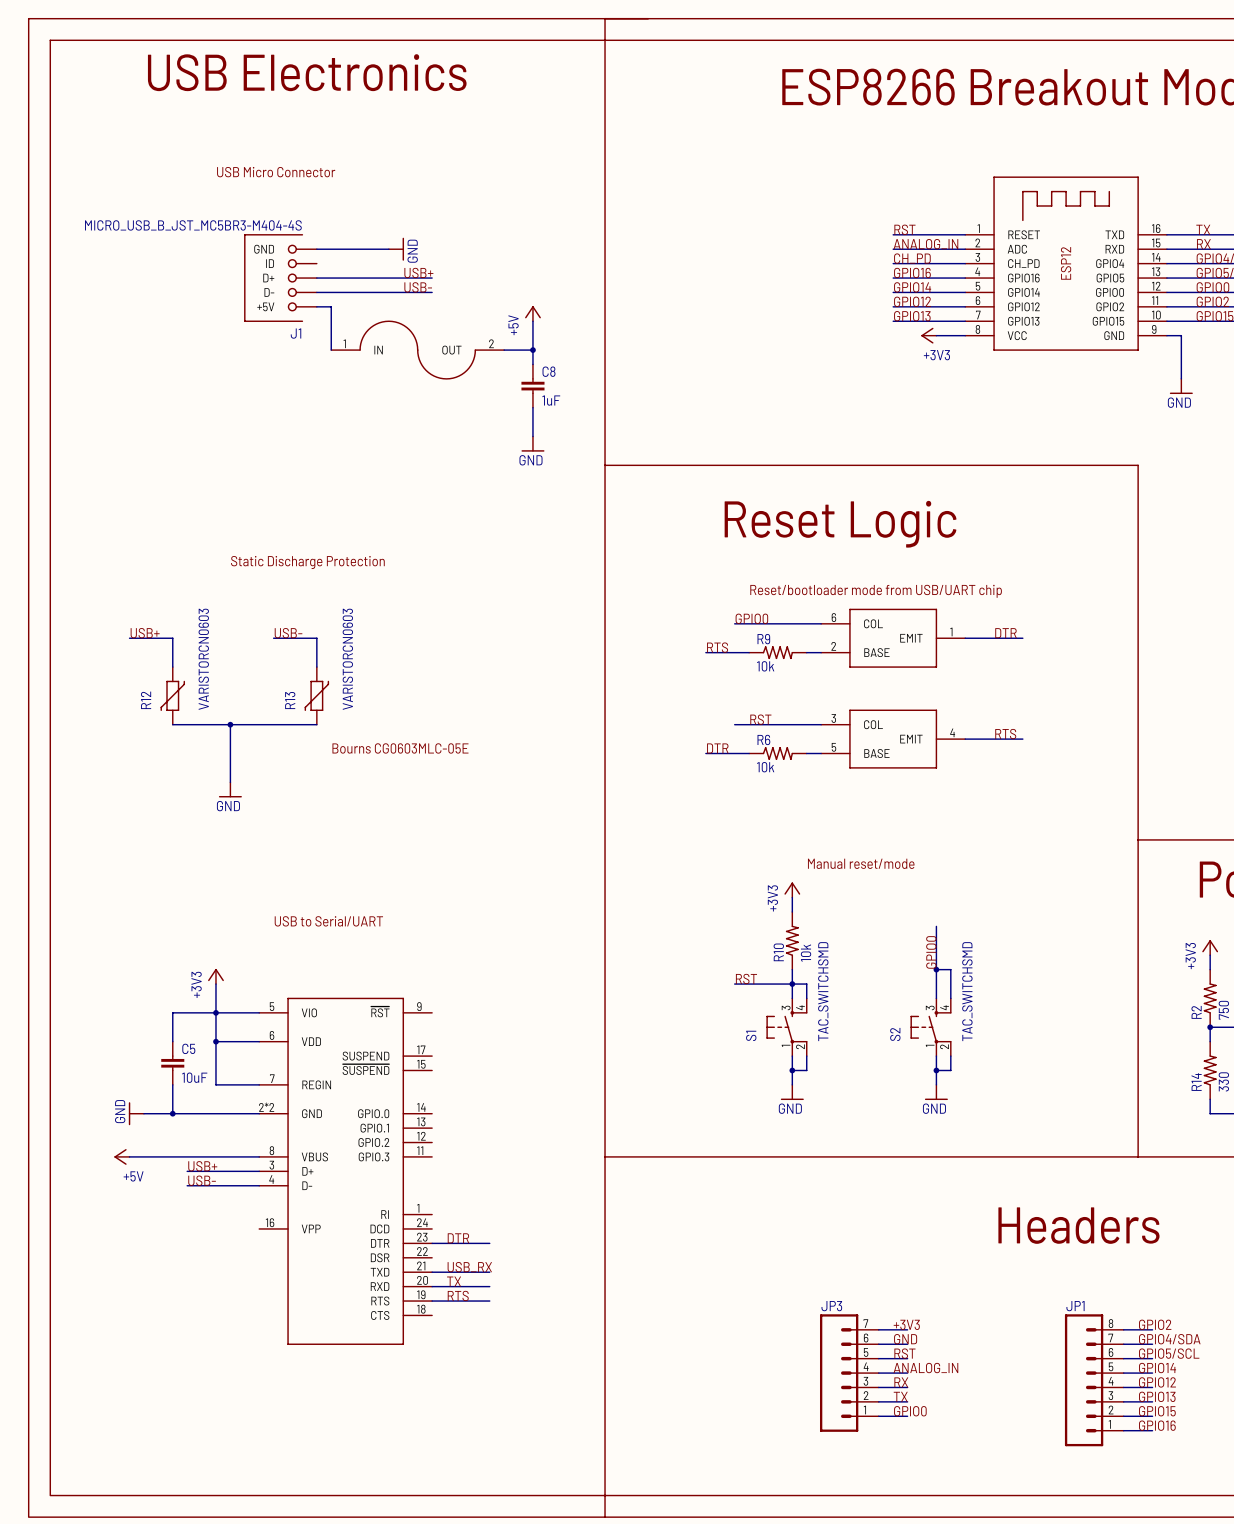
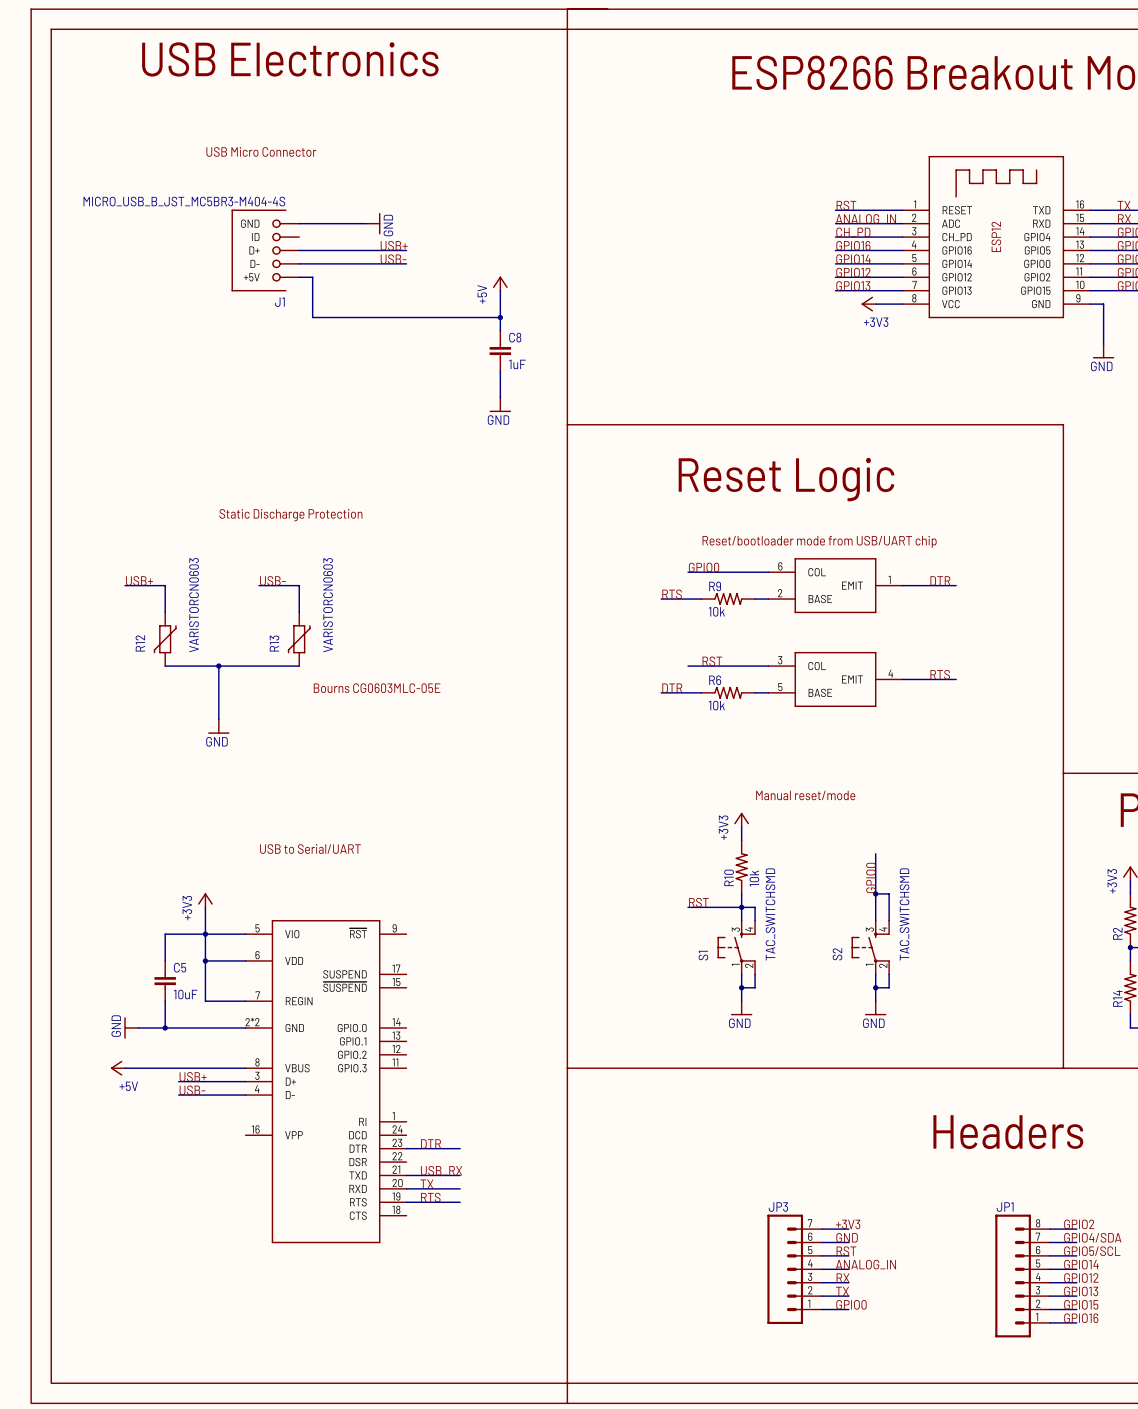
wire: none -> (312, 317) (473, 317)
part: (417, 350) -> none

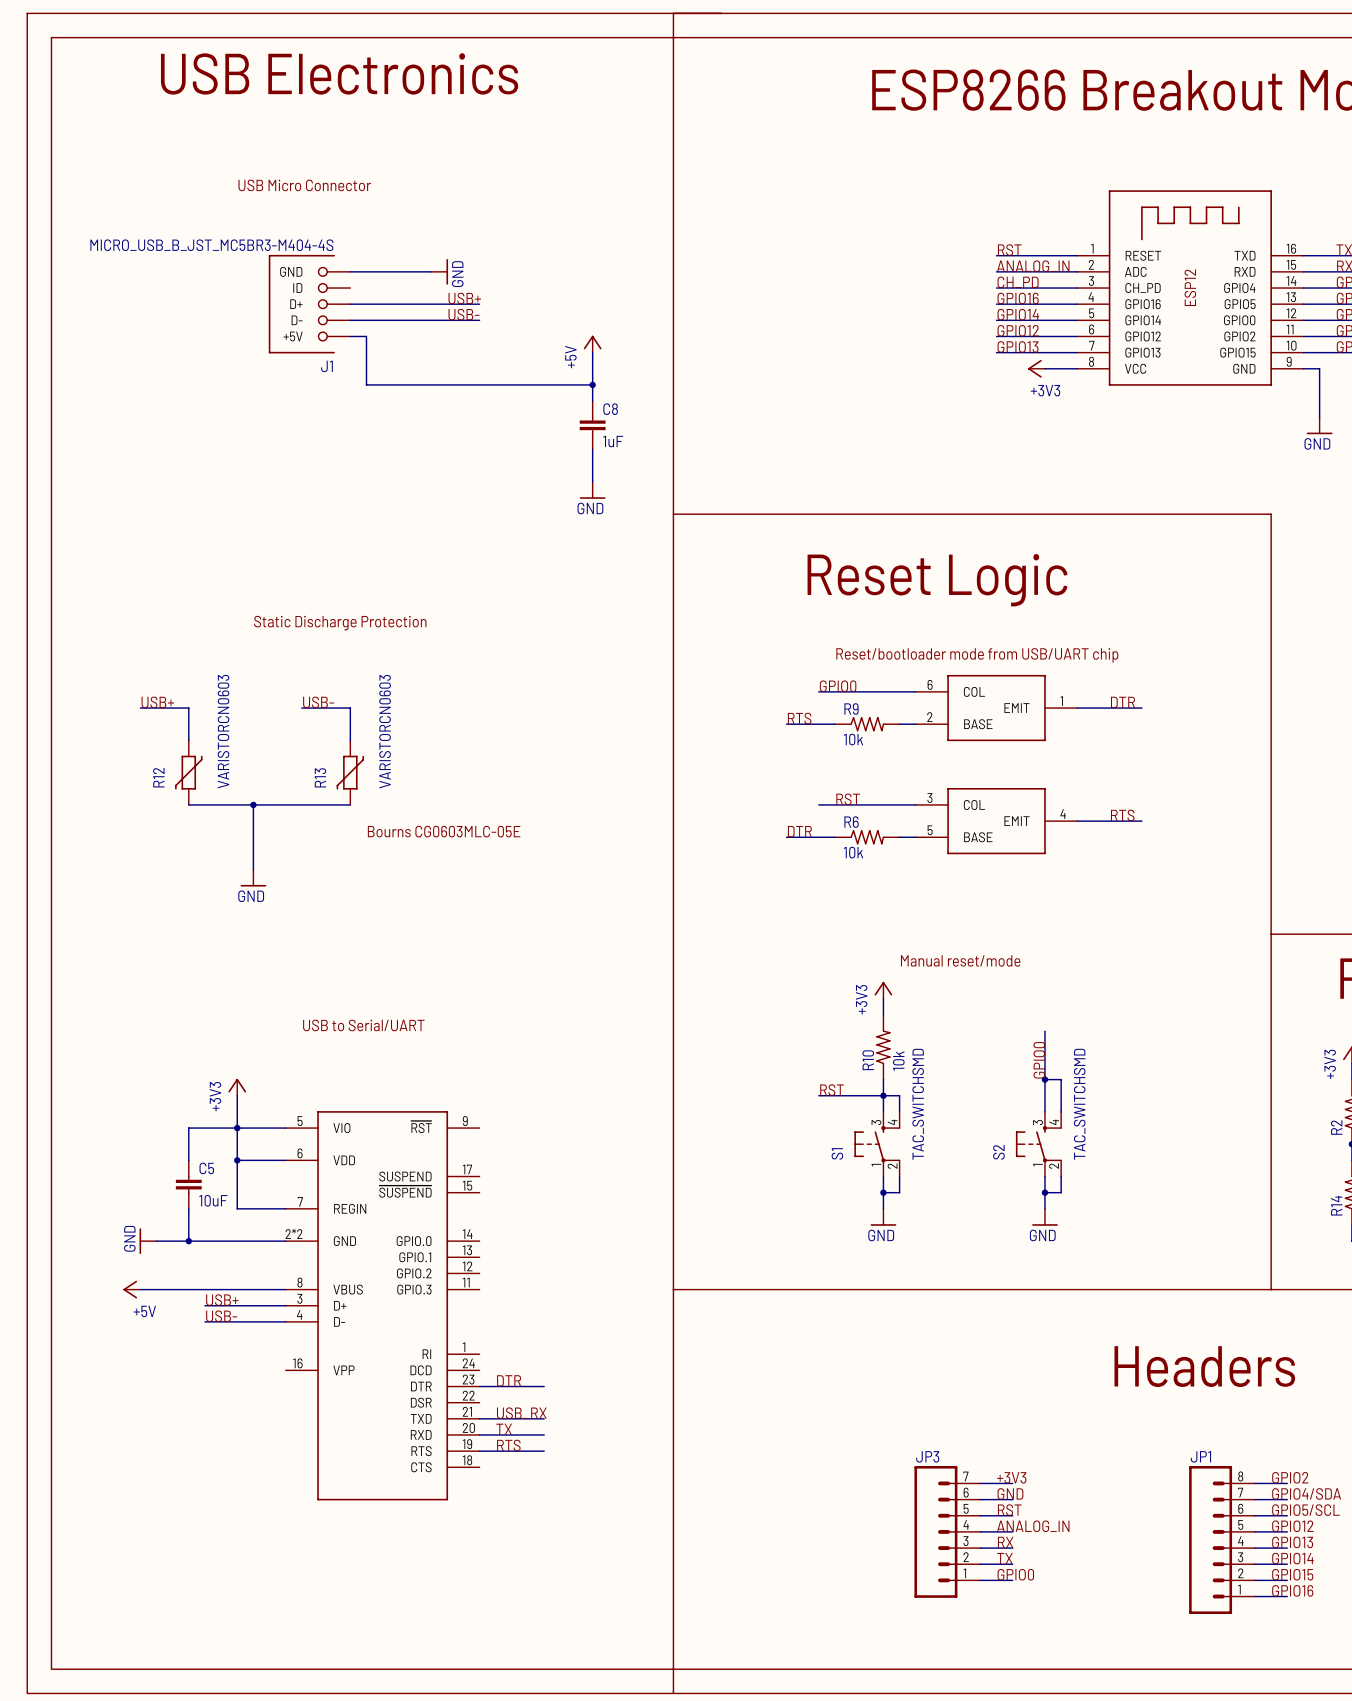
label: GPIO14 (1081, 1264) -> GPIO12 (1292, 1526)
label: GPIO12 (1081, 1278) -> GPIO13 (1292, 1542)
label: GPIO13 (1081, 1291) -> GPIO14 (1292, 1558)

